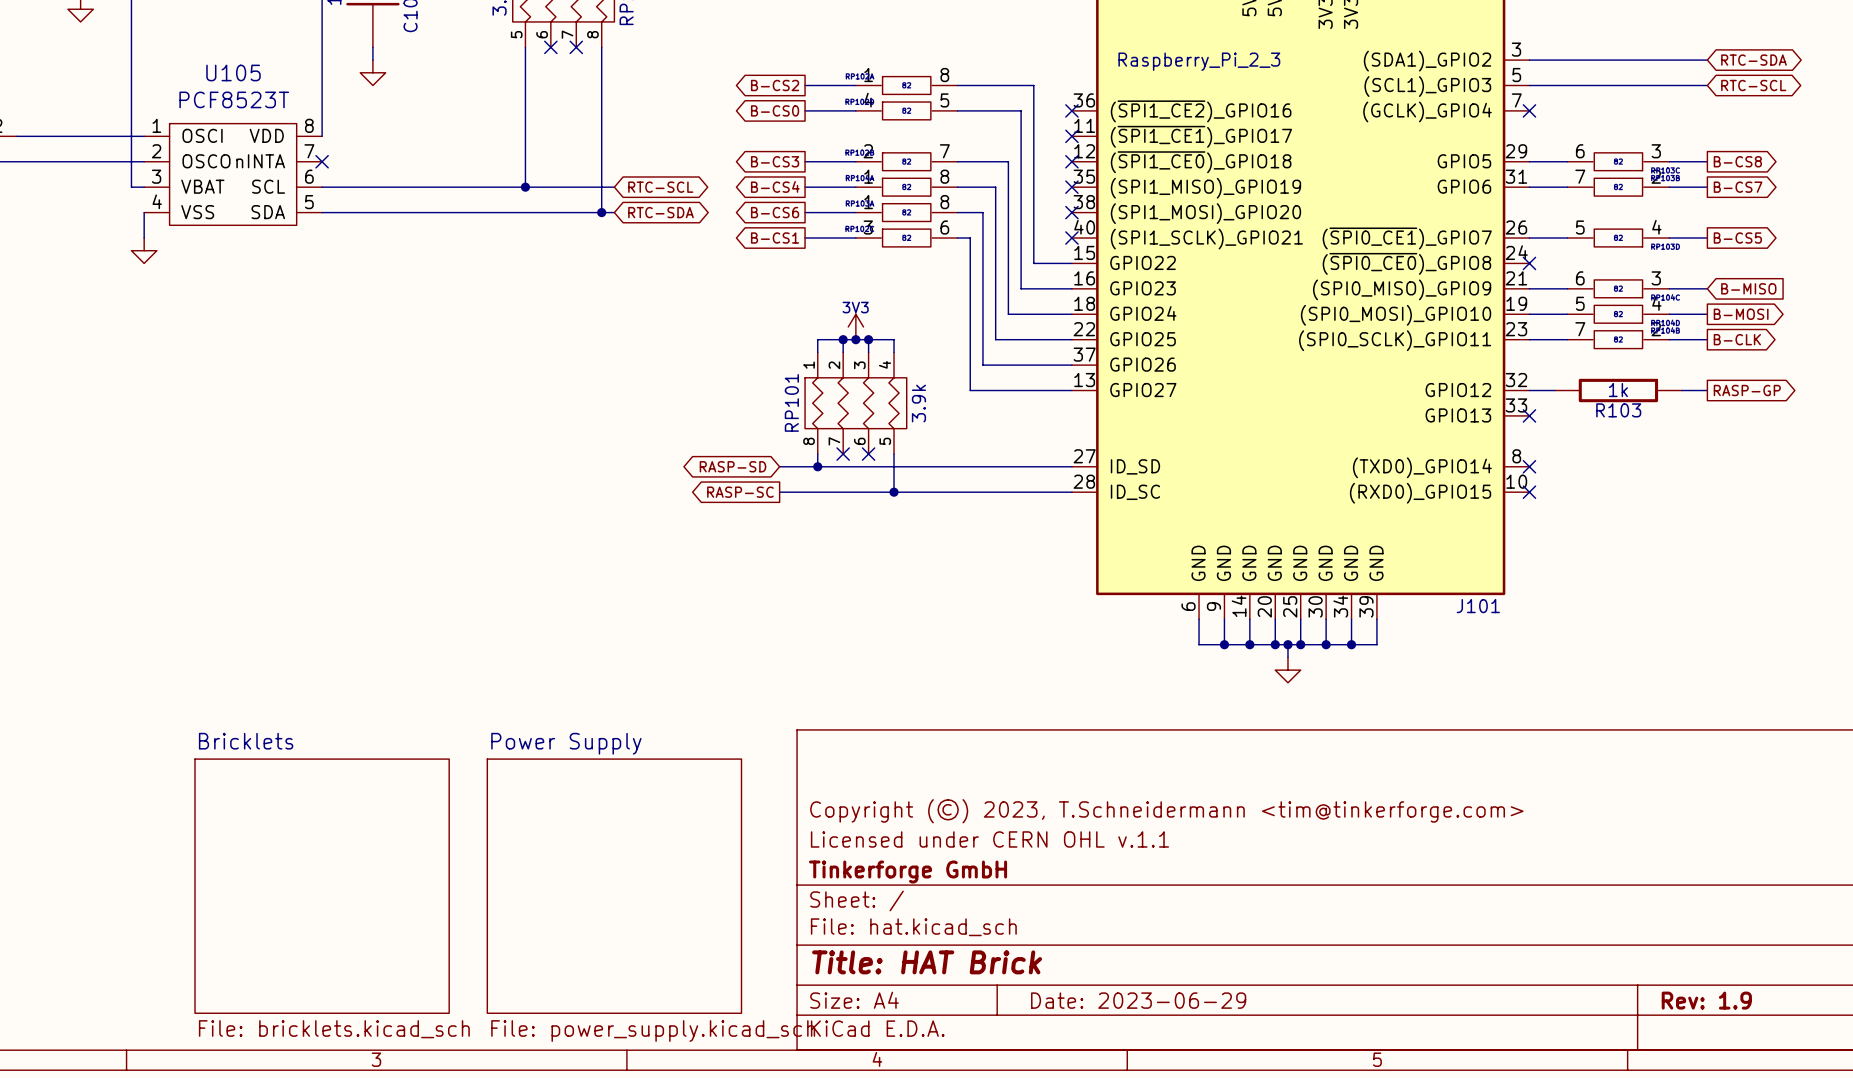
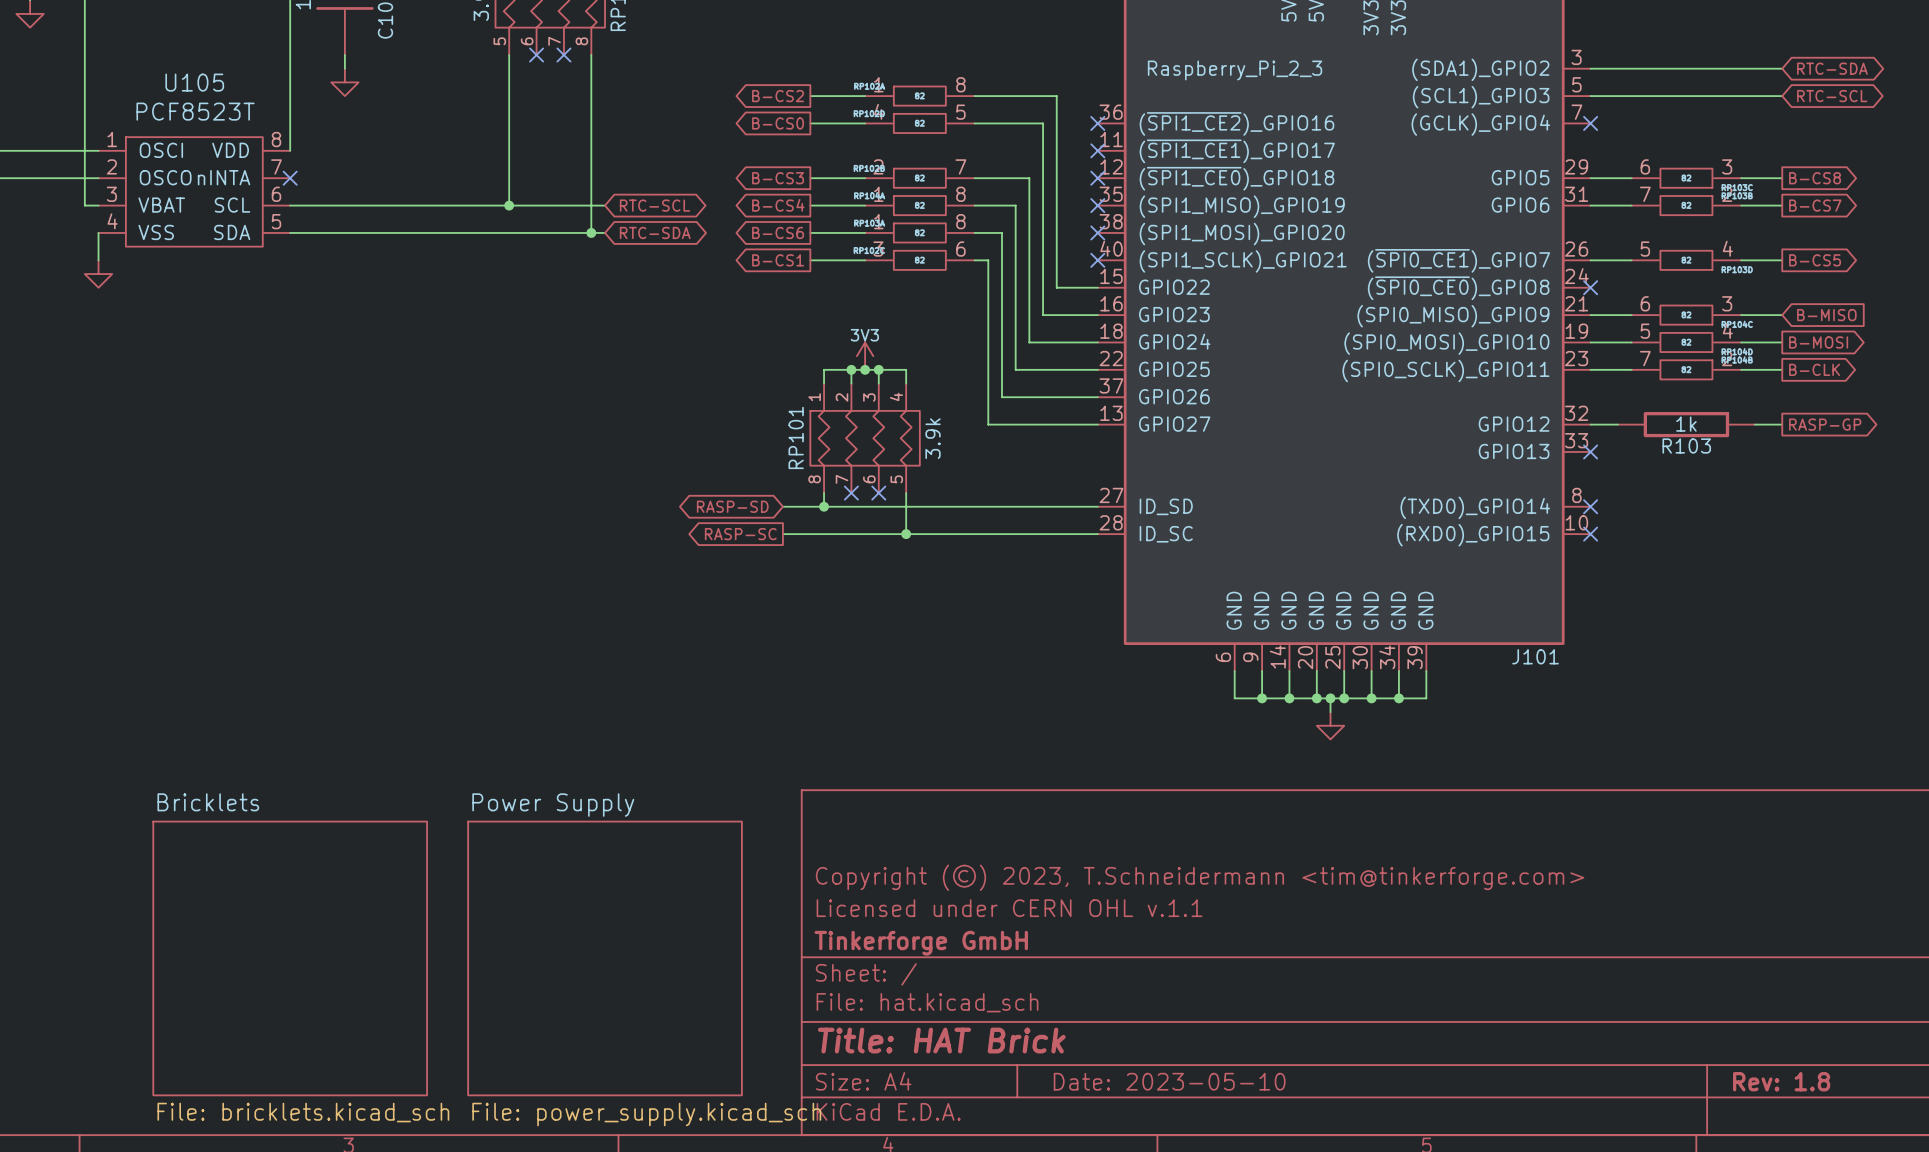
title block: Date: 2023-06-29 (1138, 1000) -> Date: 2023-05-10 (1169, 1081)
title block: Rev: 1.9 (1706, 1000) -> Rev: 1.8 (1781, 1081)

